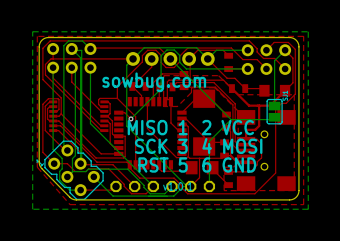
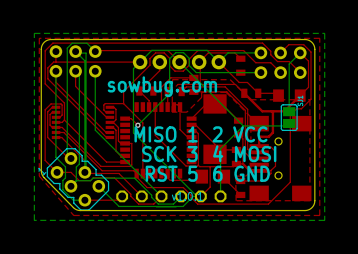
top track: (167, 81) (167, 99) (165, 101) -> none

